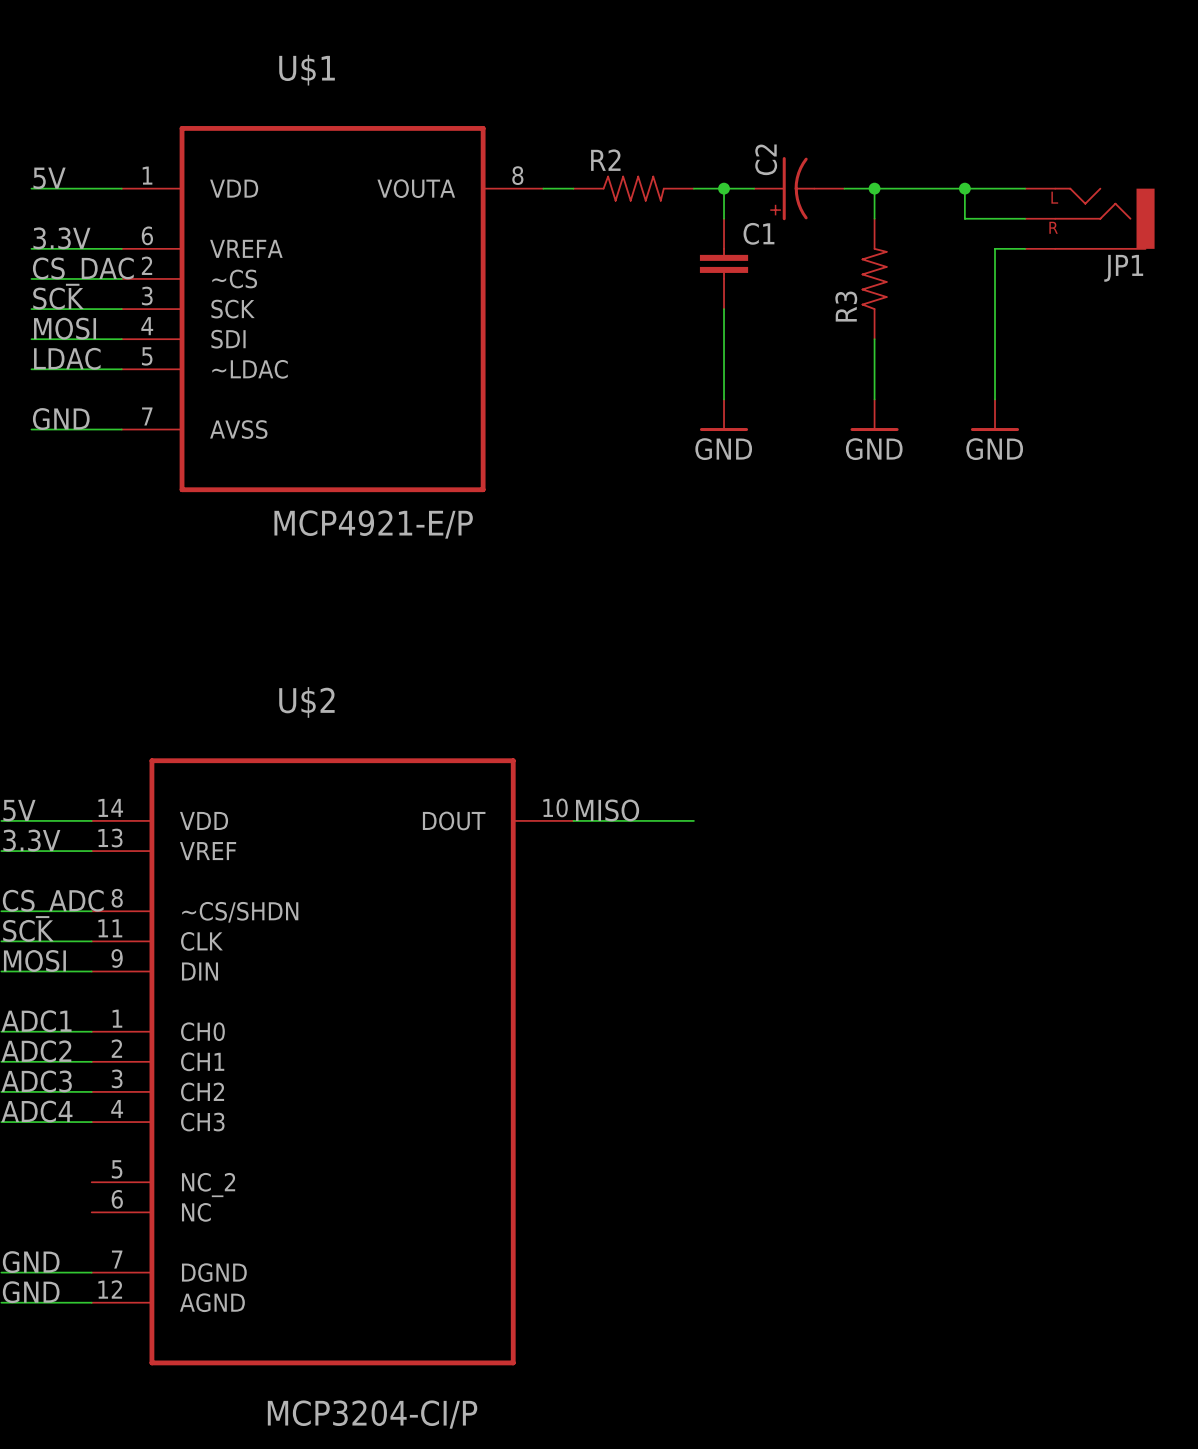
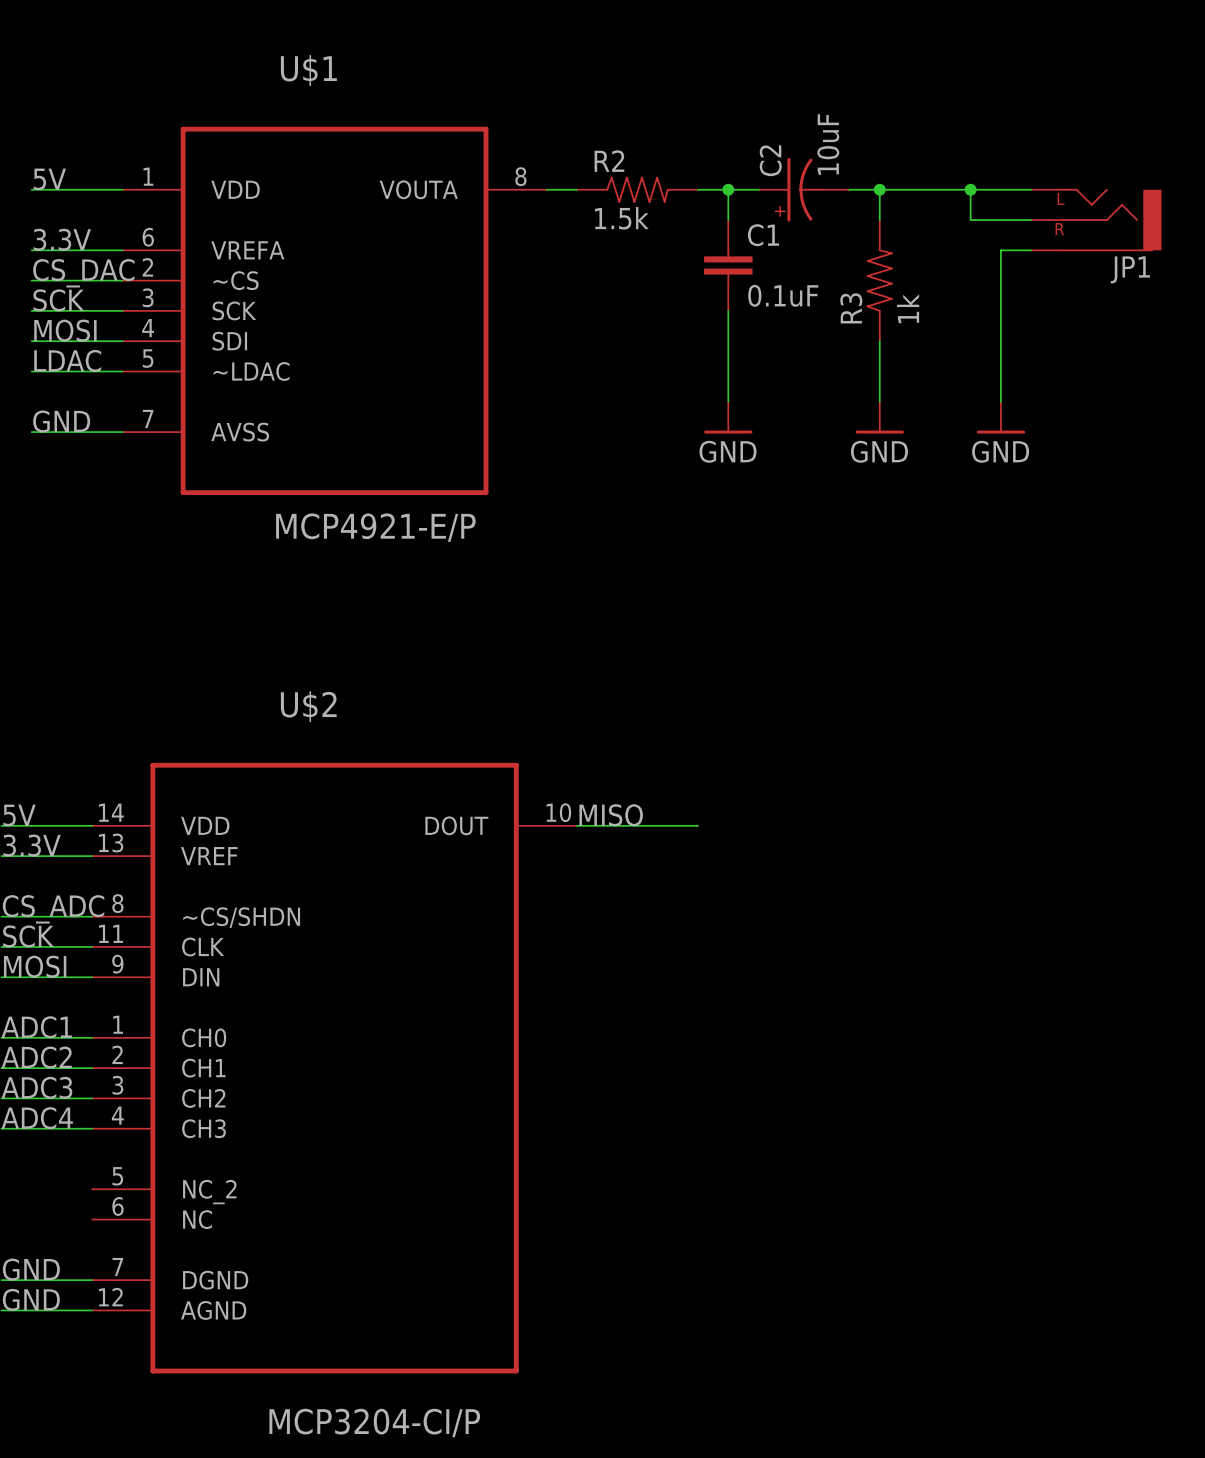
C2 value: none -> 10uF (828, 144)
R2 value: none -> 1.5k (621, 218)
C1 value: none -> 0.1uF (783, 295)
R3 value: none -> 1k (908, 308)

